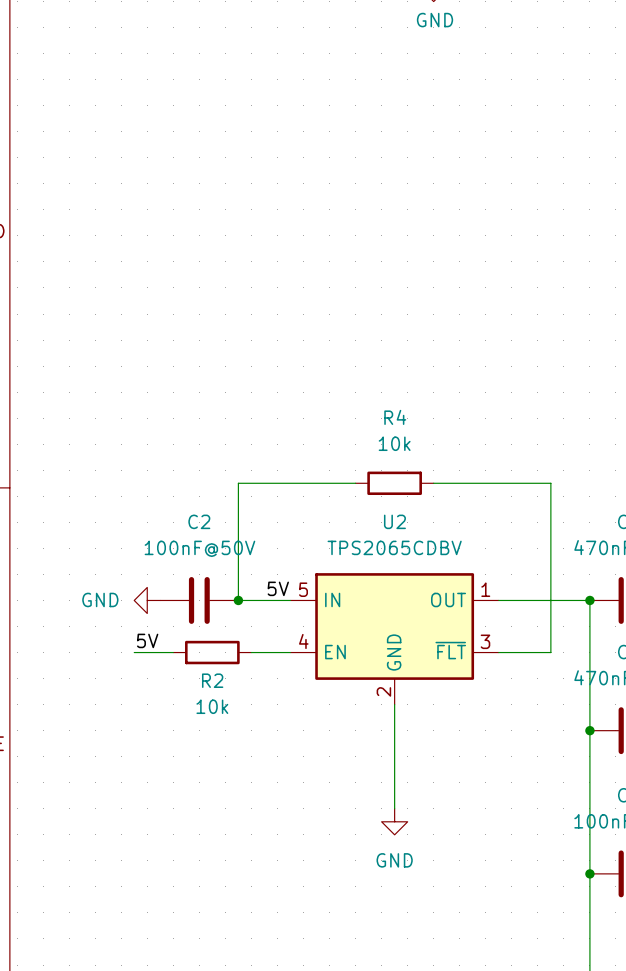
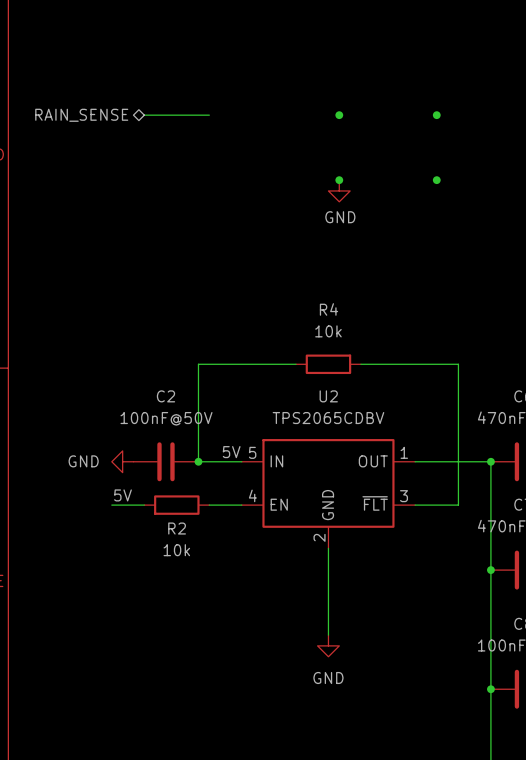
hierarchical label: none -> RAIN_SENSE (81, 115)
wire: none -> (144, 115) (209, 115)
junction: none -> (339, 115)
junction: none -> (436, 115)
junction: none -> (339, 180)
junction: none -> (436, 180)
power symbol: none -> GND (339, 190)

